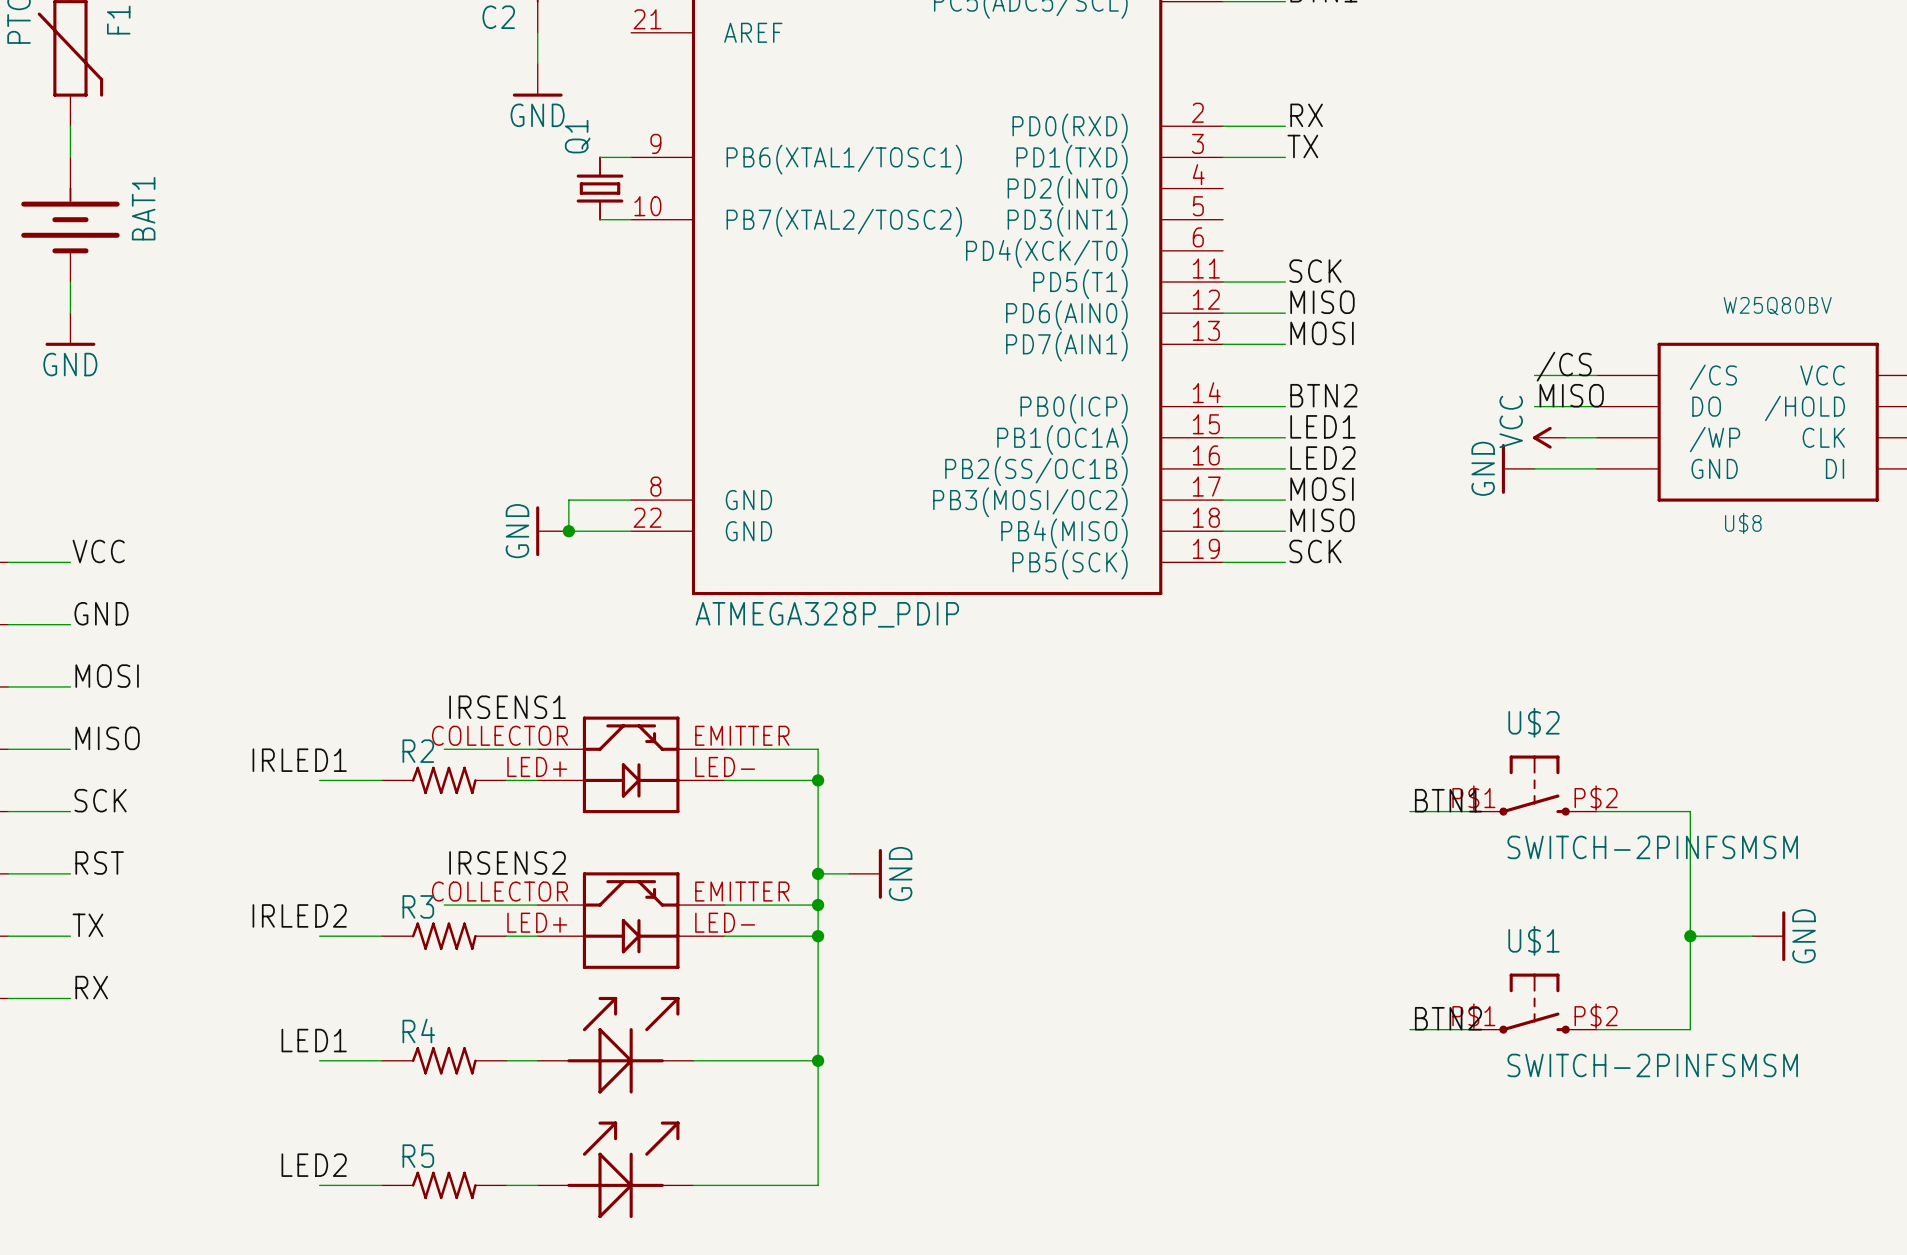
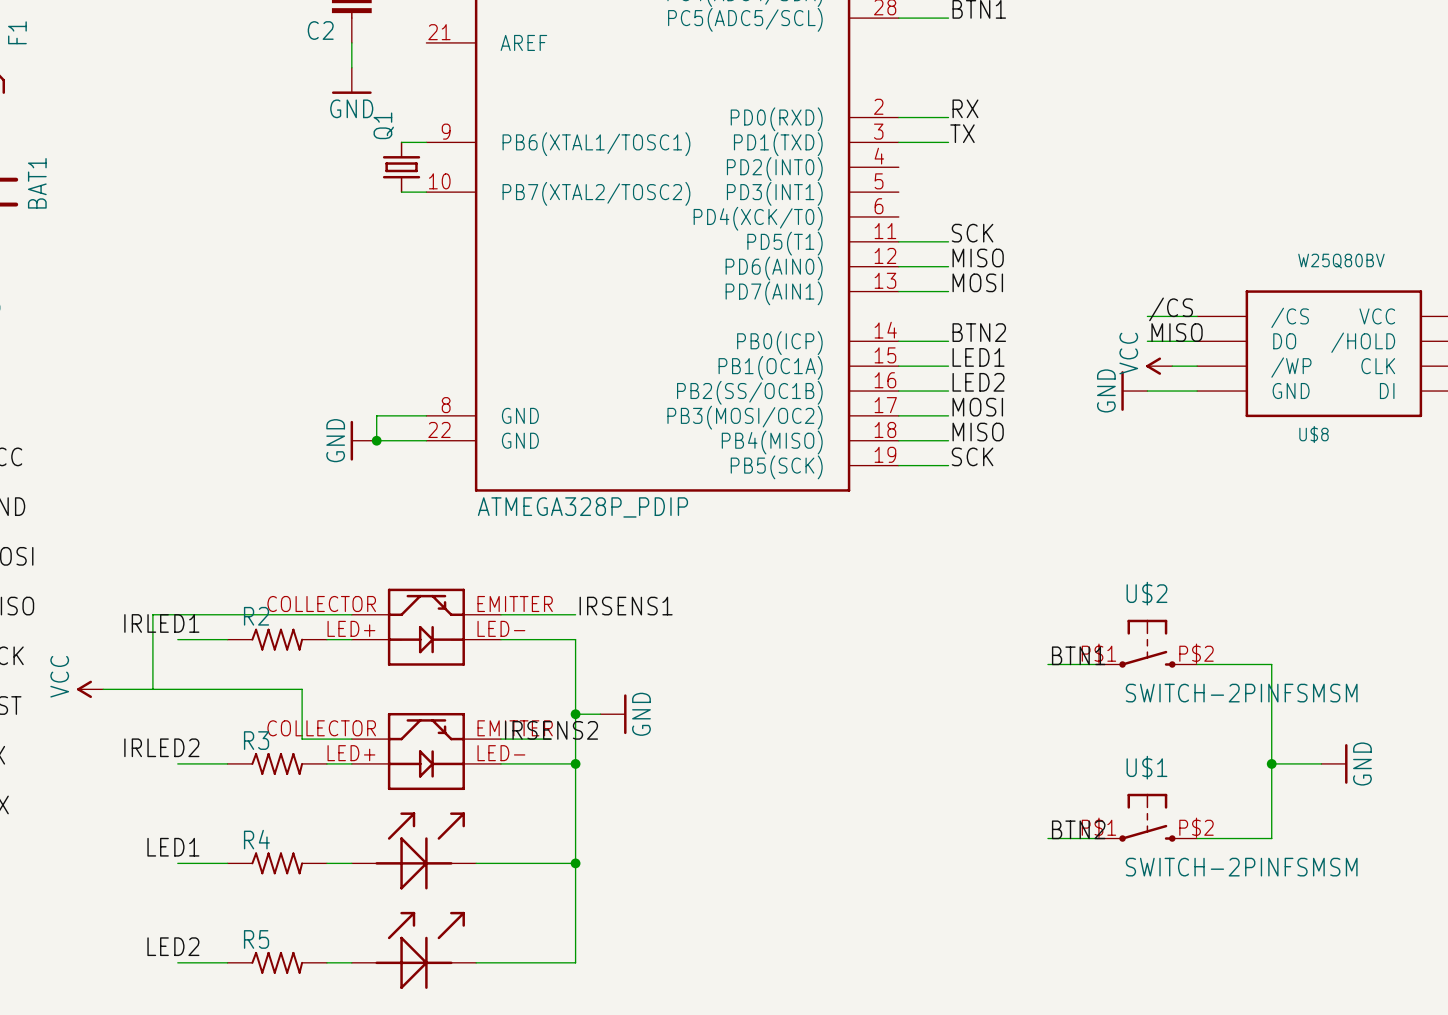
label: IRSENS1 (507, 707) -> none
label: none -> IRSENS1 (626, 606)
wire: none -> (277, 614) (152, 614) (152, 689)
wire: (818, 749) (818, 780) -> none
junction: (818, 780) -> none
power symbol: none -> VCC (90, 689)
label position: IRSENS2 (507, 862) -> IRSENS2 (551, 730)
wire: (444, 905) (475, 905) -> (103, 689) (302, 689) (302, 739)
wire: (786, 905) (818, 905) -> none
junction: (818, 905) -> none

